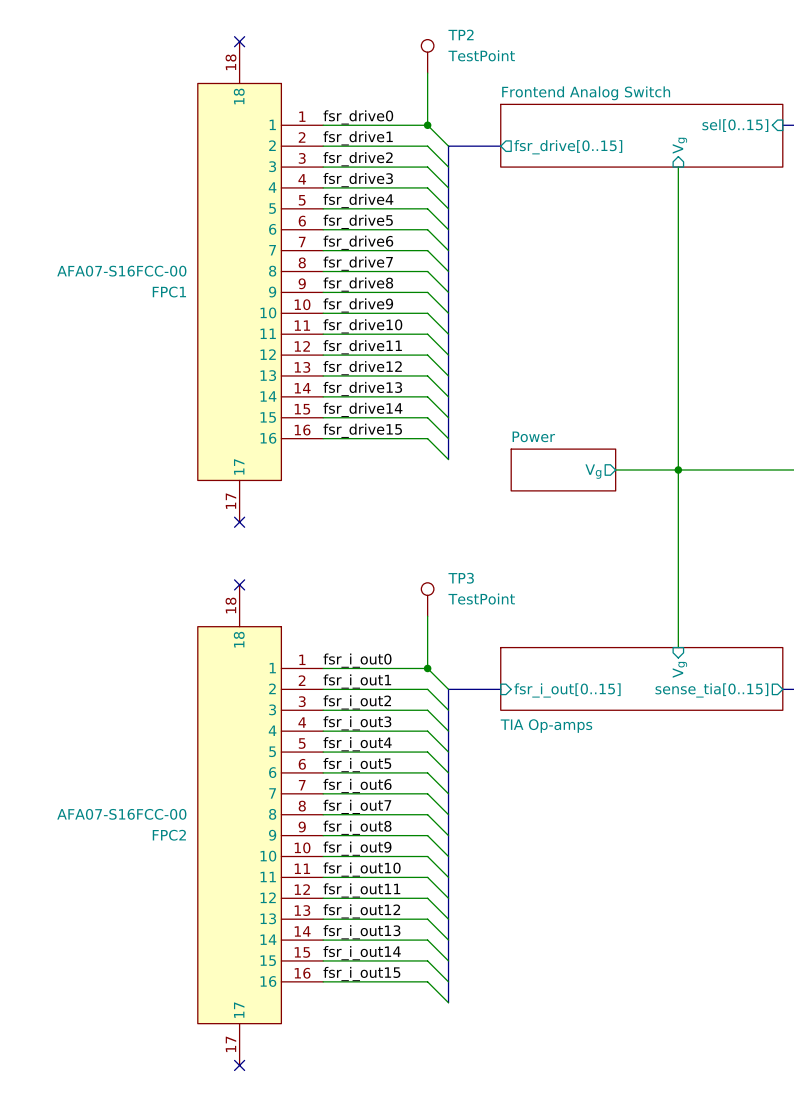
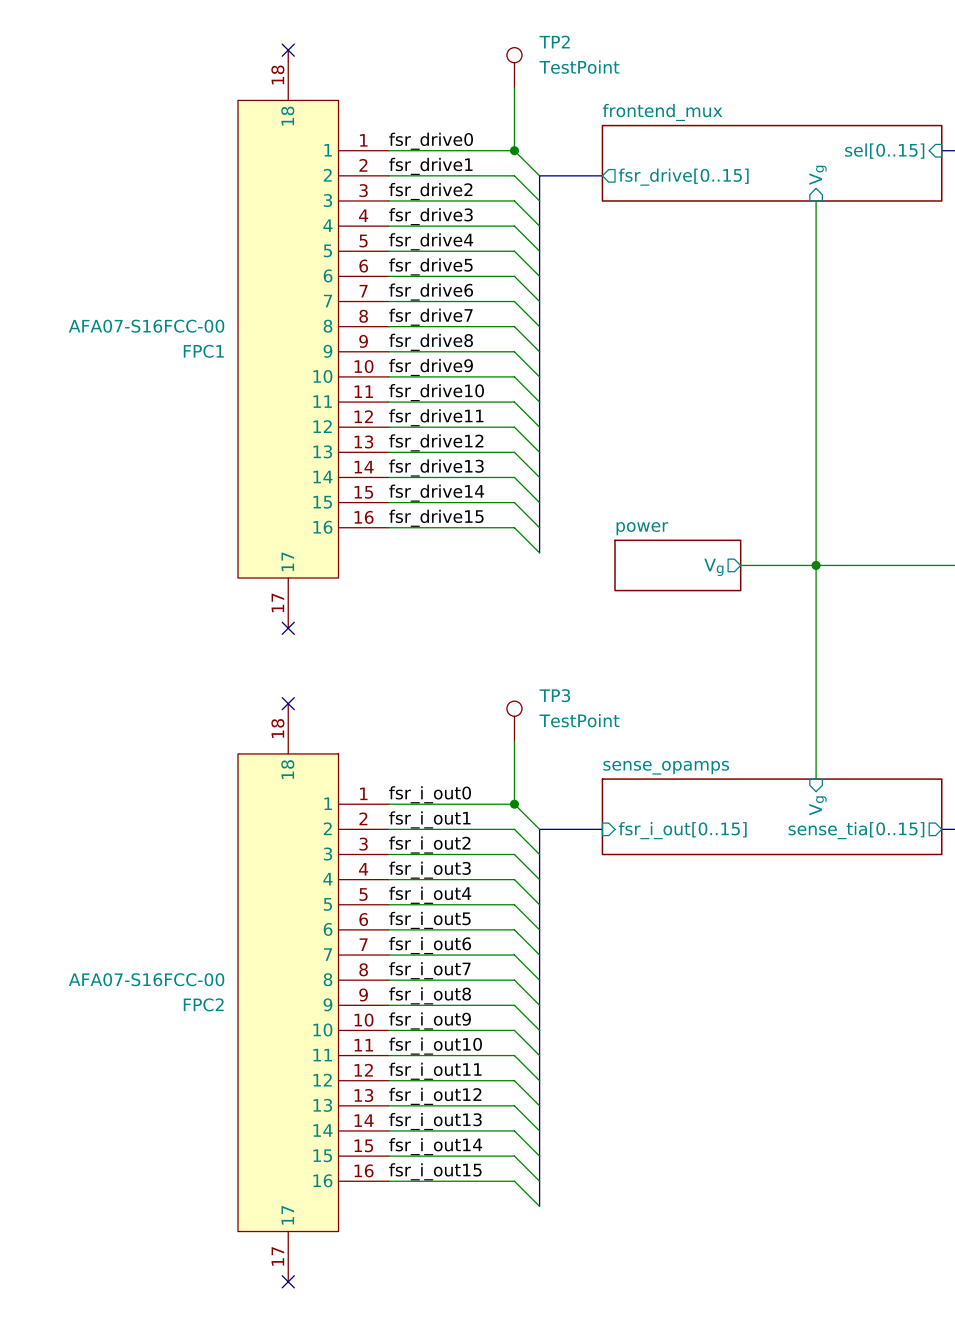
sheet Frontend Analog Switch name: Frontend Analog Switch (586, 93) -> frontend_mux (662, 112)
sheet Power name: Power (533, 436) -> power (642, 528)
sheet TIA Op-amps name: TIA Op-amps (546, 726) -> sense_opamps (666, 767)

